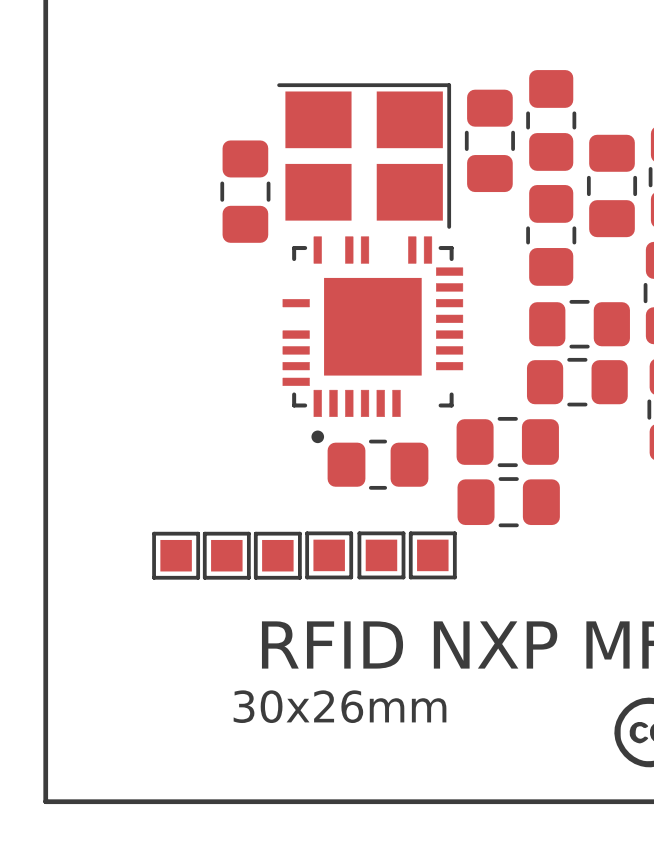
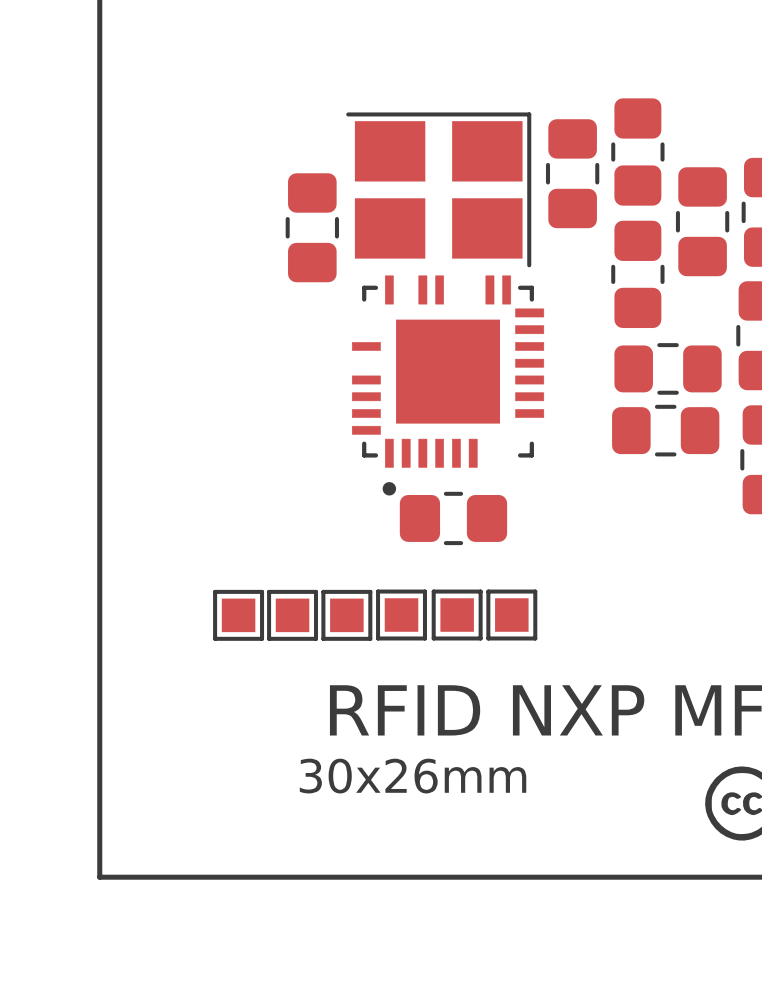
part: (507, 442) -> none
part: (508, 502) -> none

